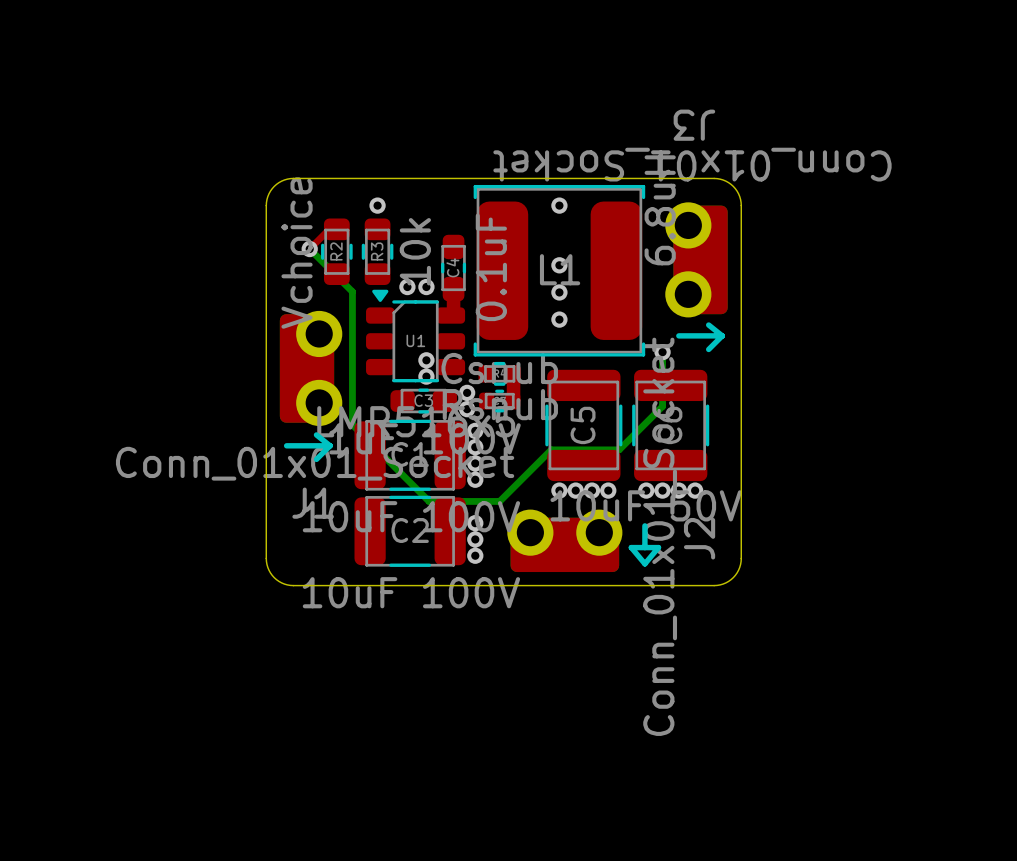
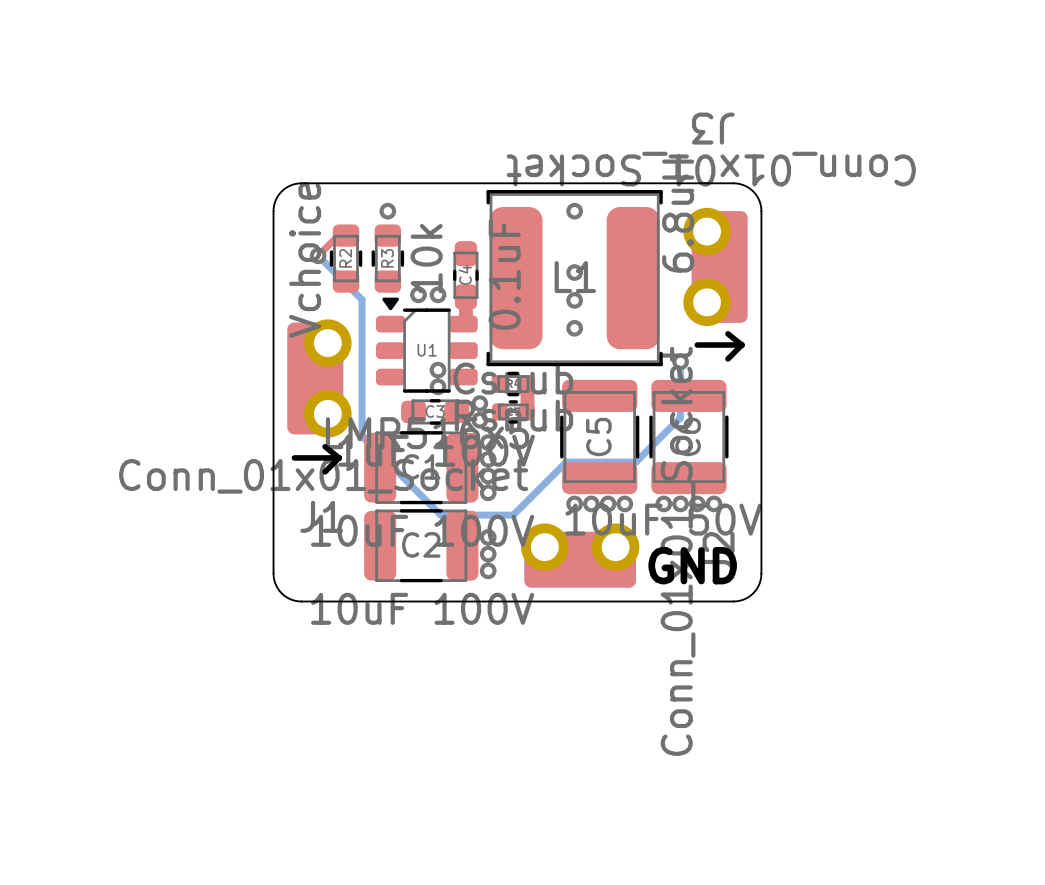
line: (644, 525) (644, 547) -> none
line: (631, 547) (658, 547) (644, 563) (631, 547) -> none
text: none -> GND (692, 565)

